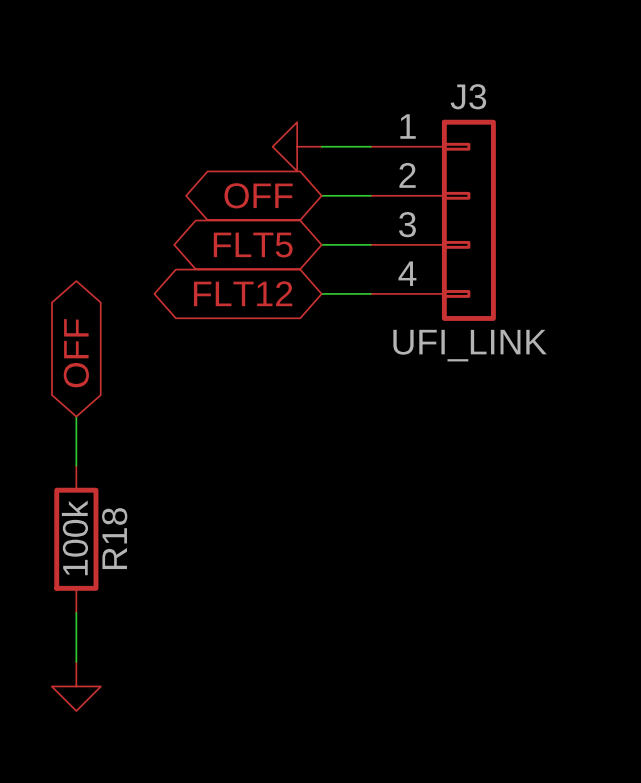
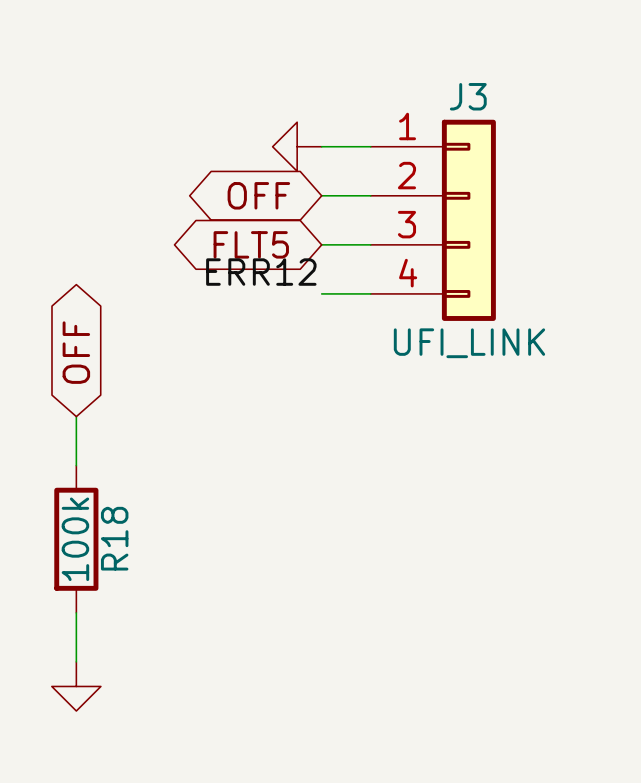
label: none -> ERR12 (261, 272)
global label: FLT12 (243, 293) -> none

